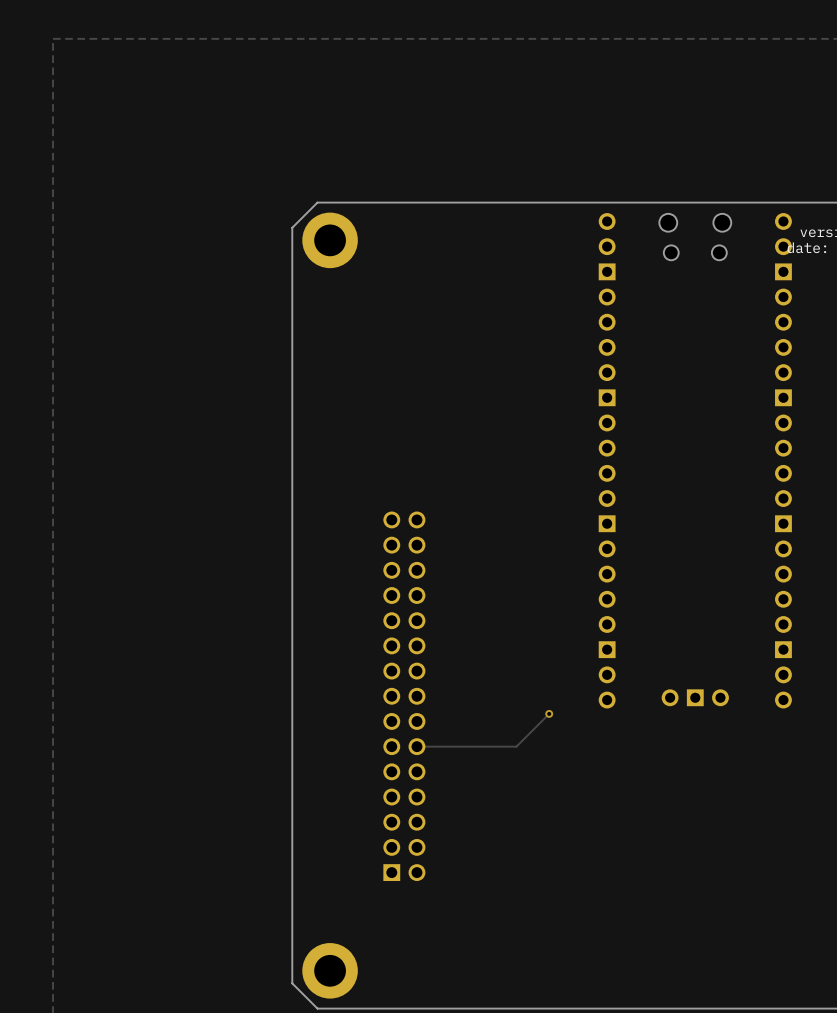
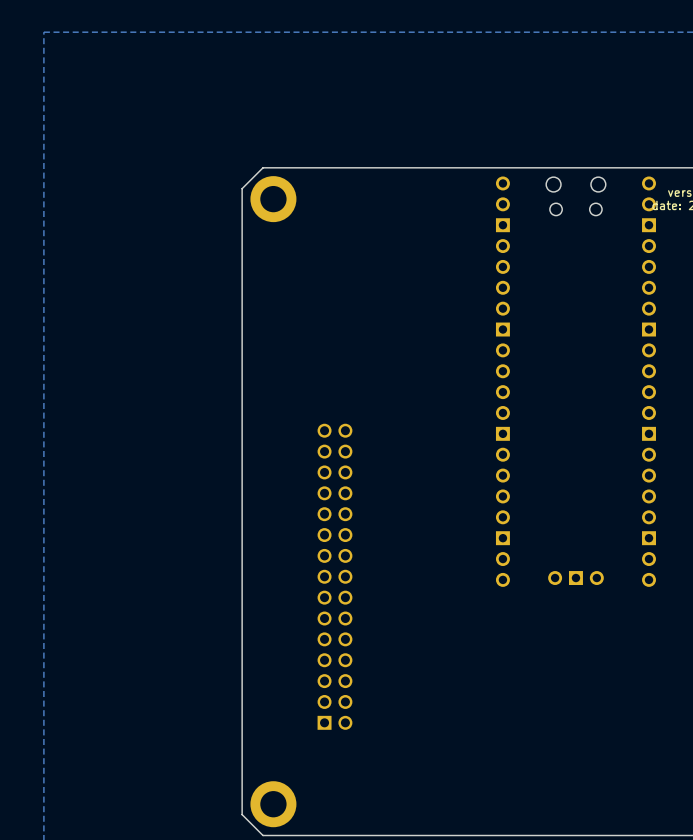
track: (549, 713) (516, 746) (416, 746) -> none
via: (549, 713) -> none

